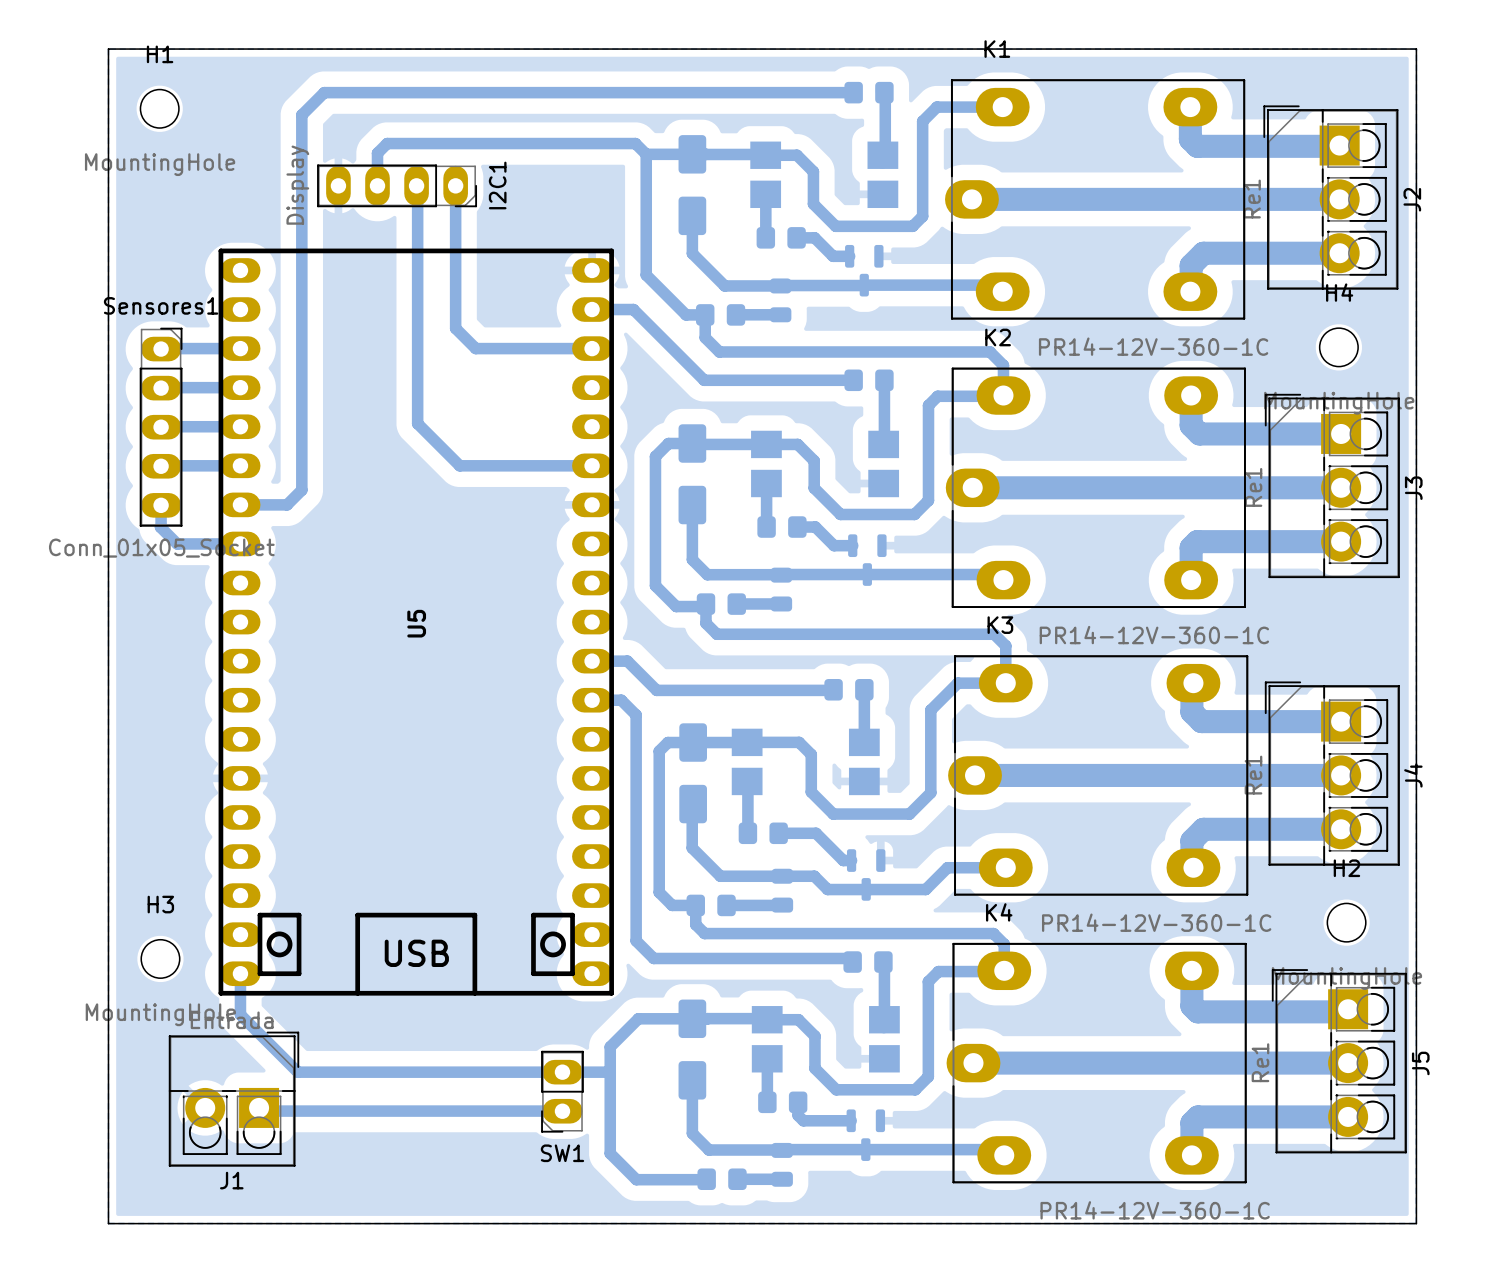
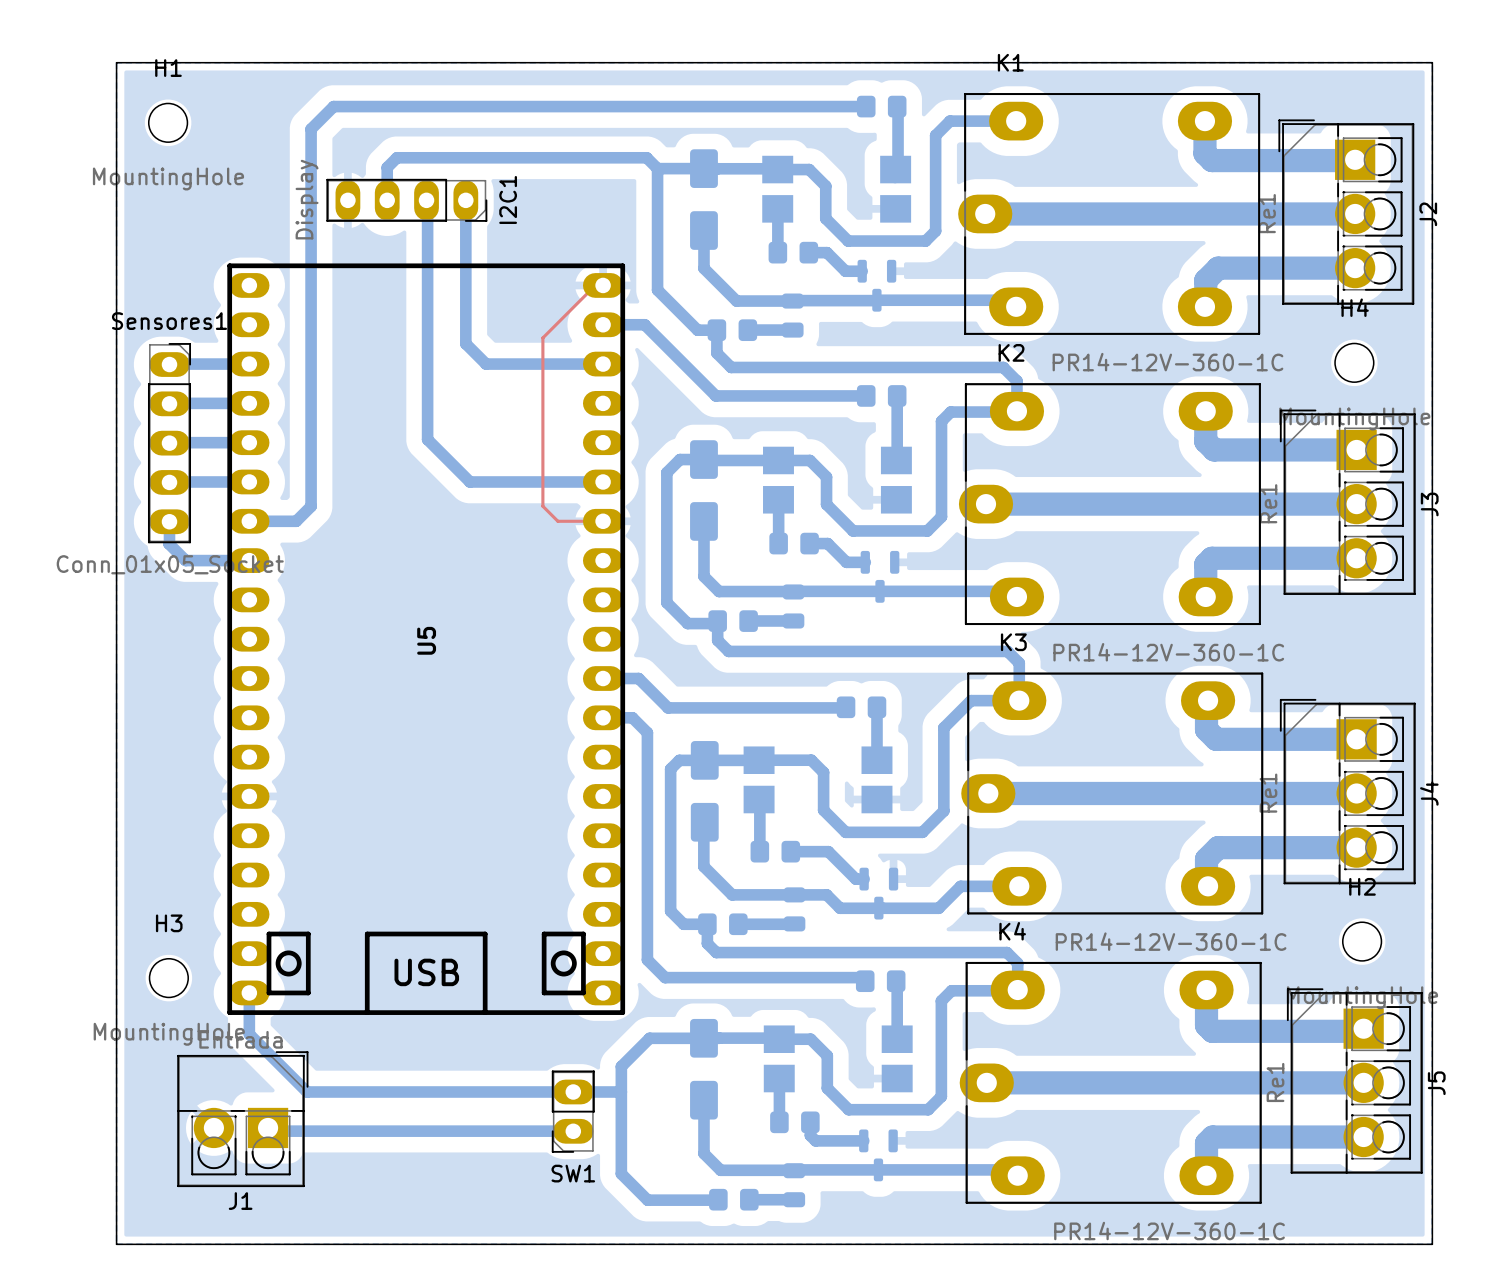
top track: none -> (603, 285) (595, 285) (542, 337) (542, 506) (557, 521) (603, 521)

